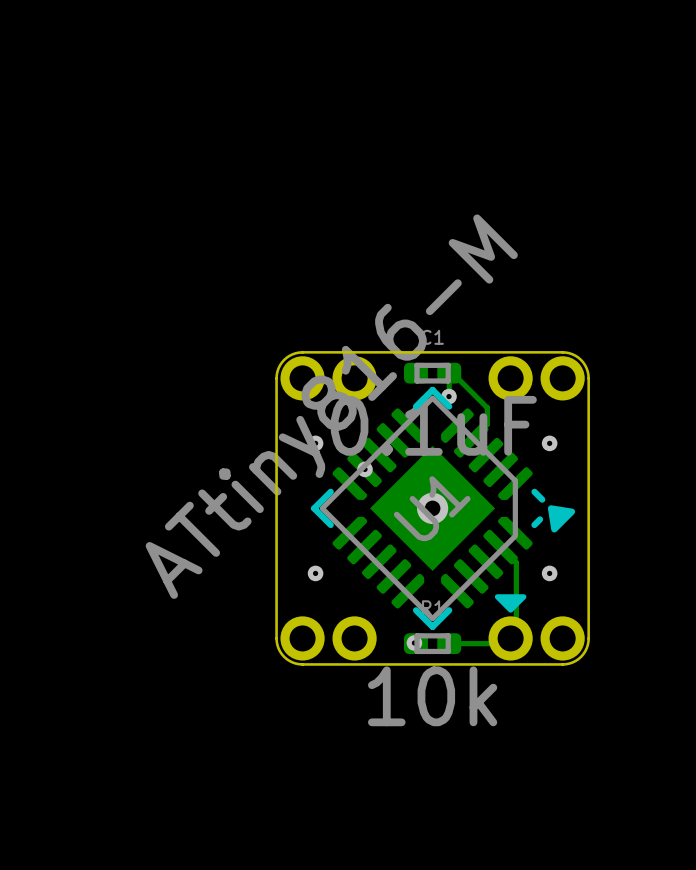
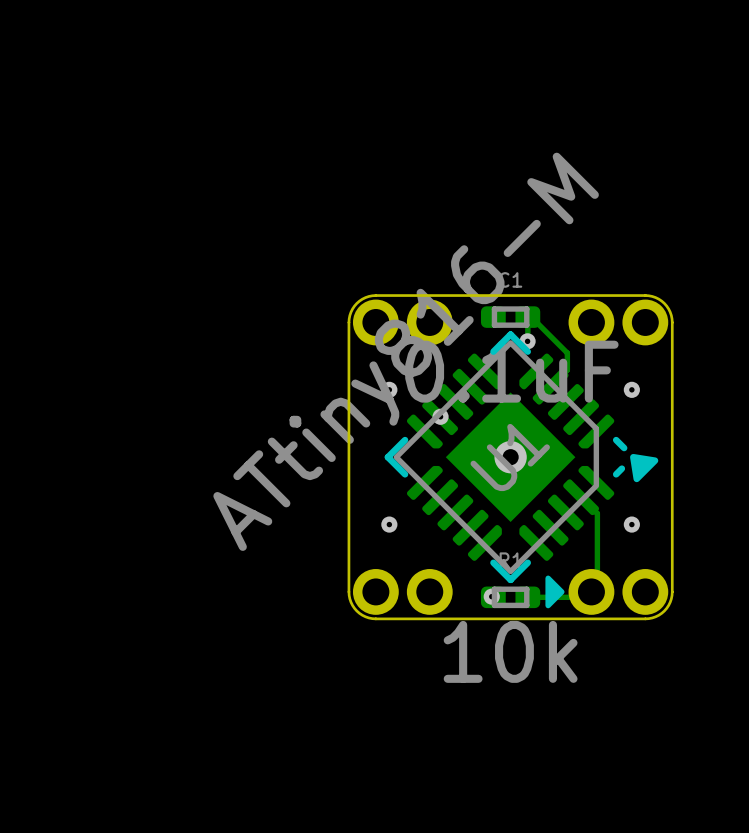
drawing: [494, 594, 527, 613] -> none
drawing: none -> [545, 575, 565, 609]

